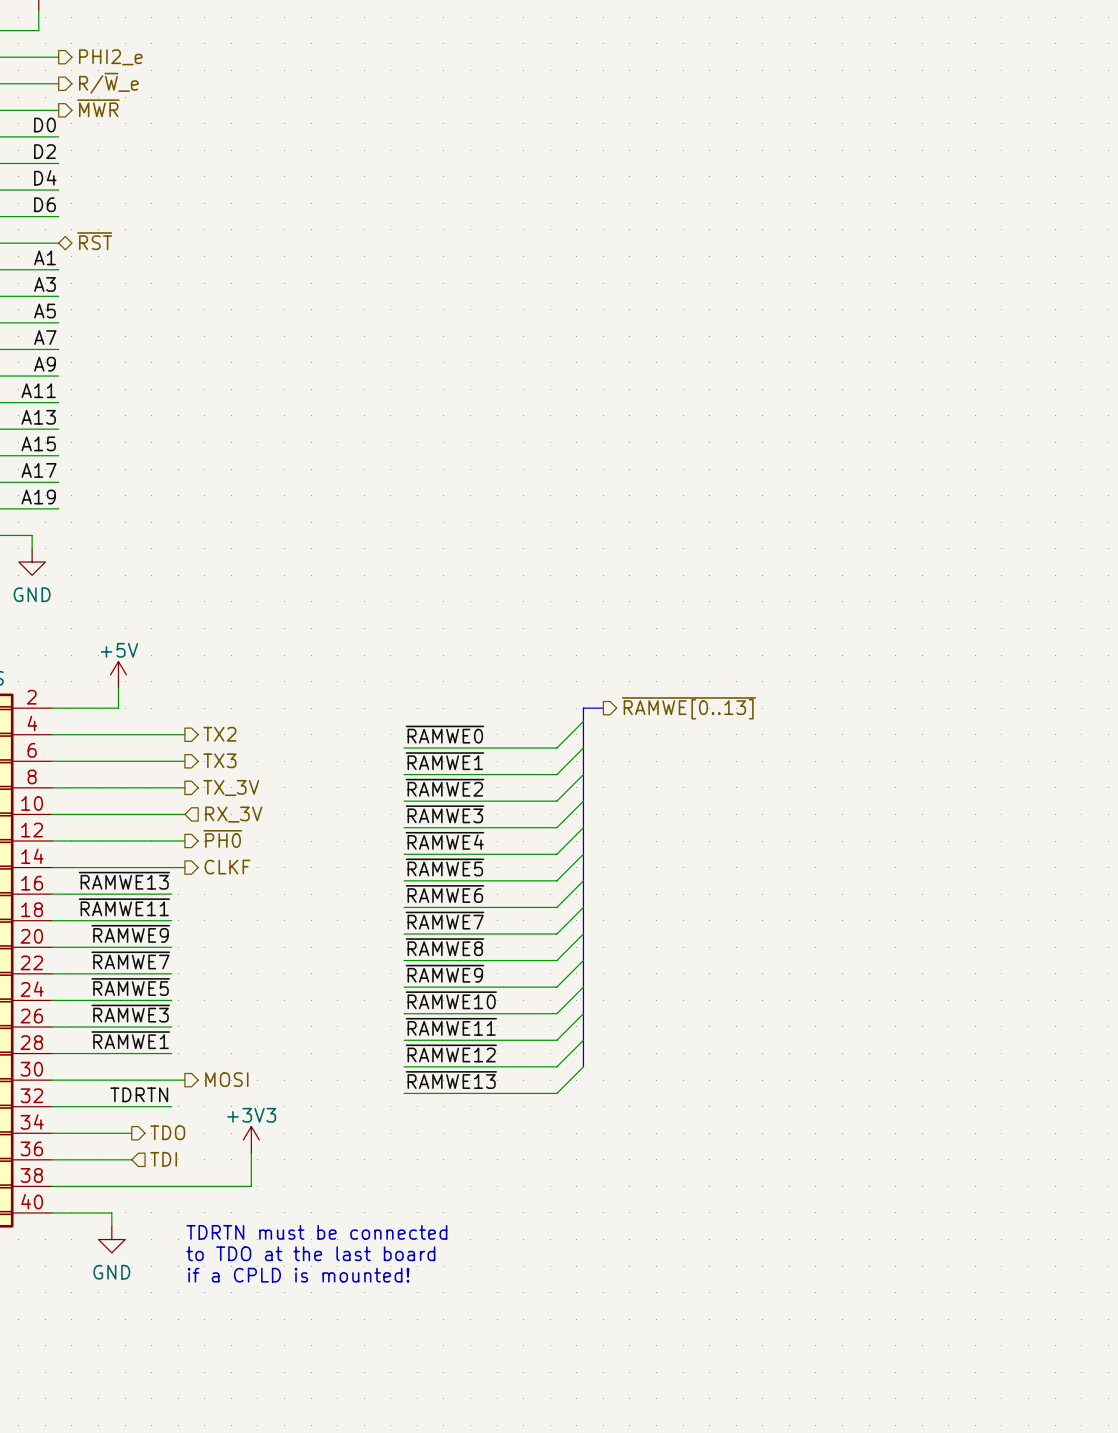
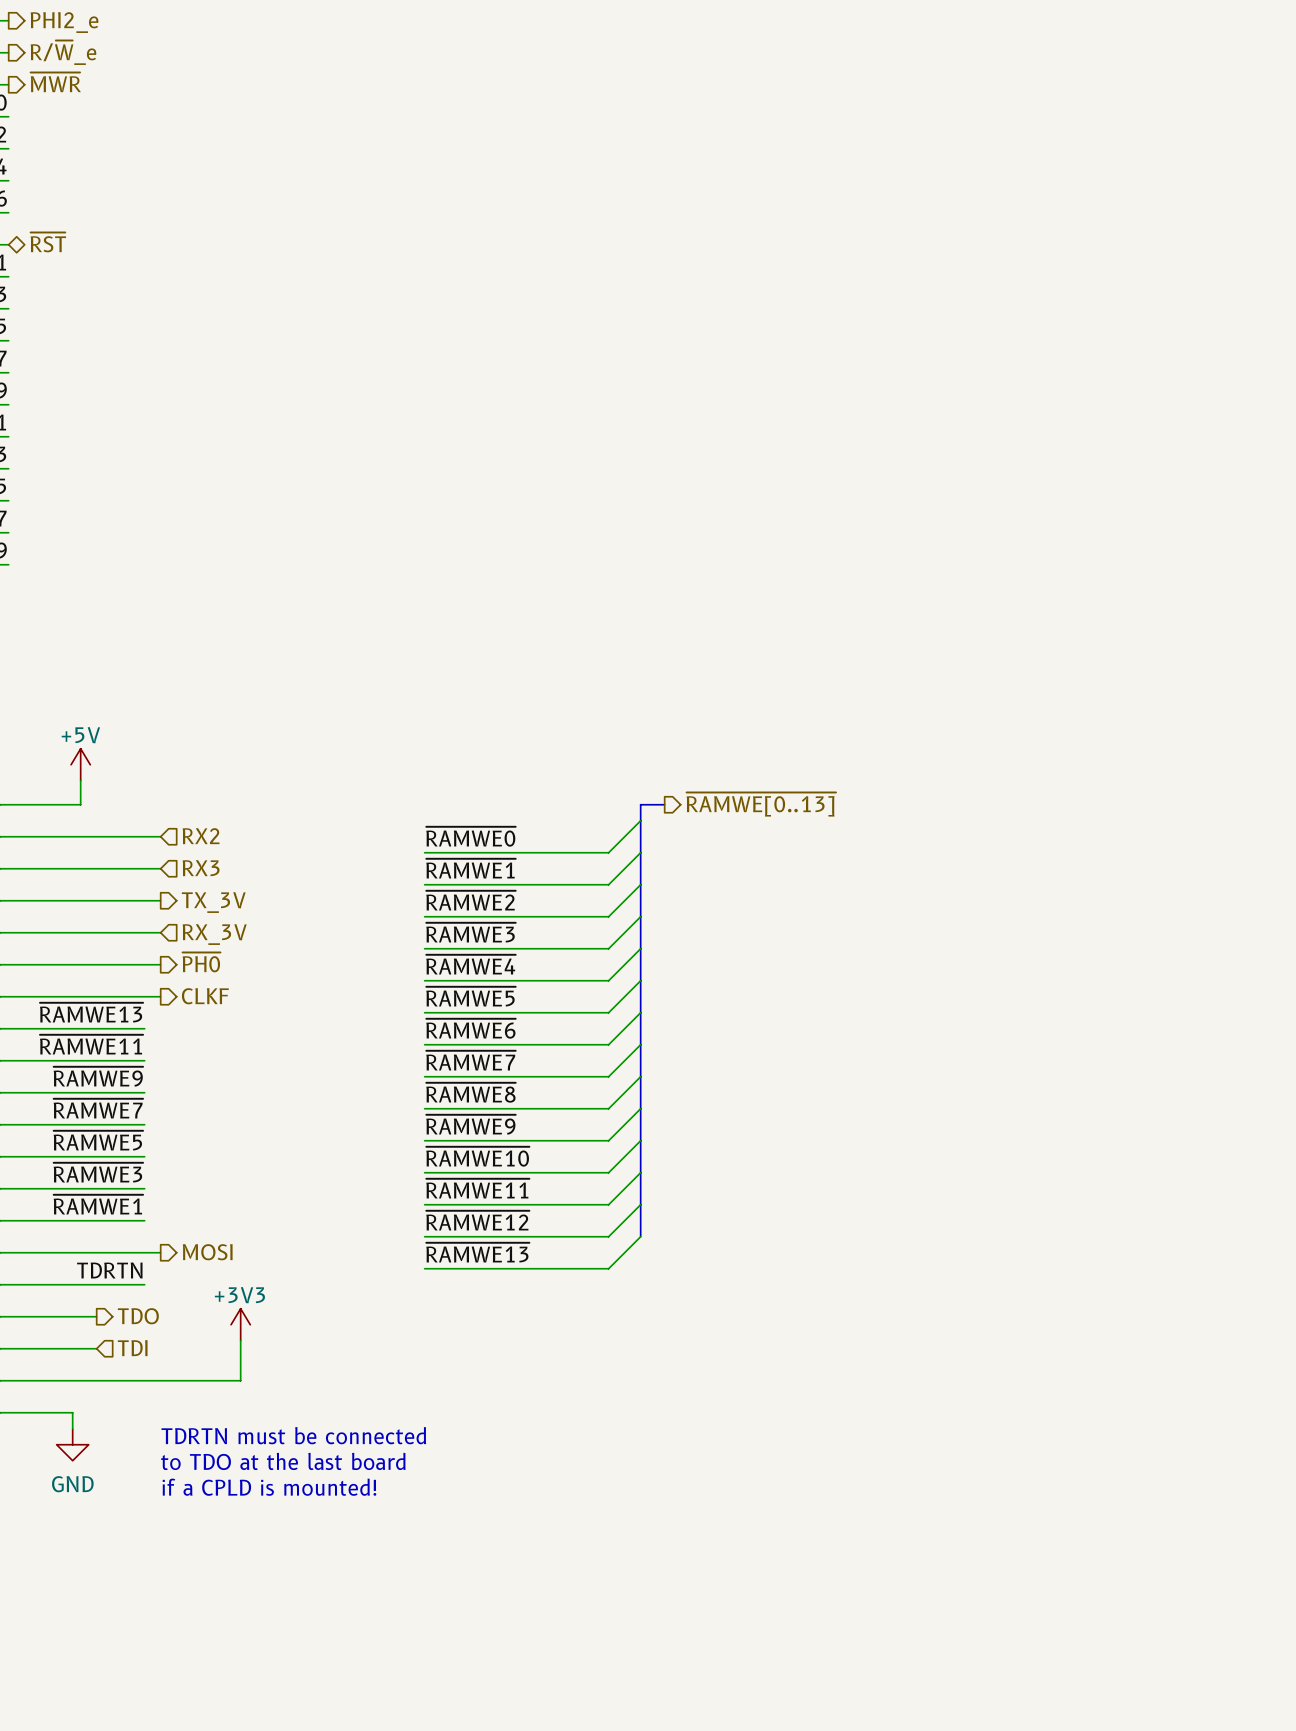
hierarchical label shape: output (219, 734) -> input (201, 836)
hierarchical label: TX2 (219, 734) -> RX2 (201, 836)
hierarchical label shape: output (219, 760) -> input (201, 868)
hierarchical label: TX3 (219, 760) -> RX3 (201, 868)

